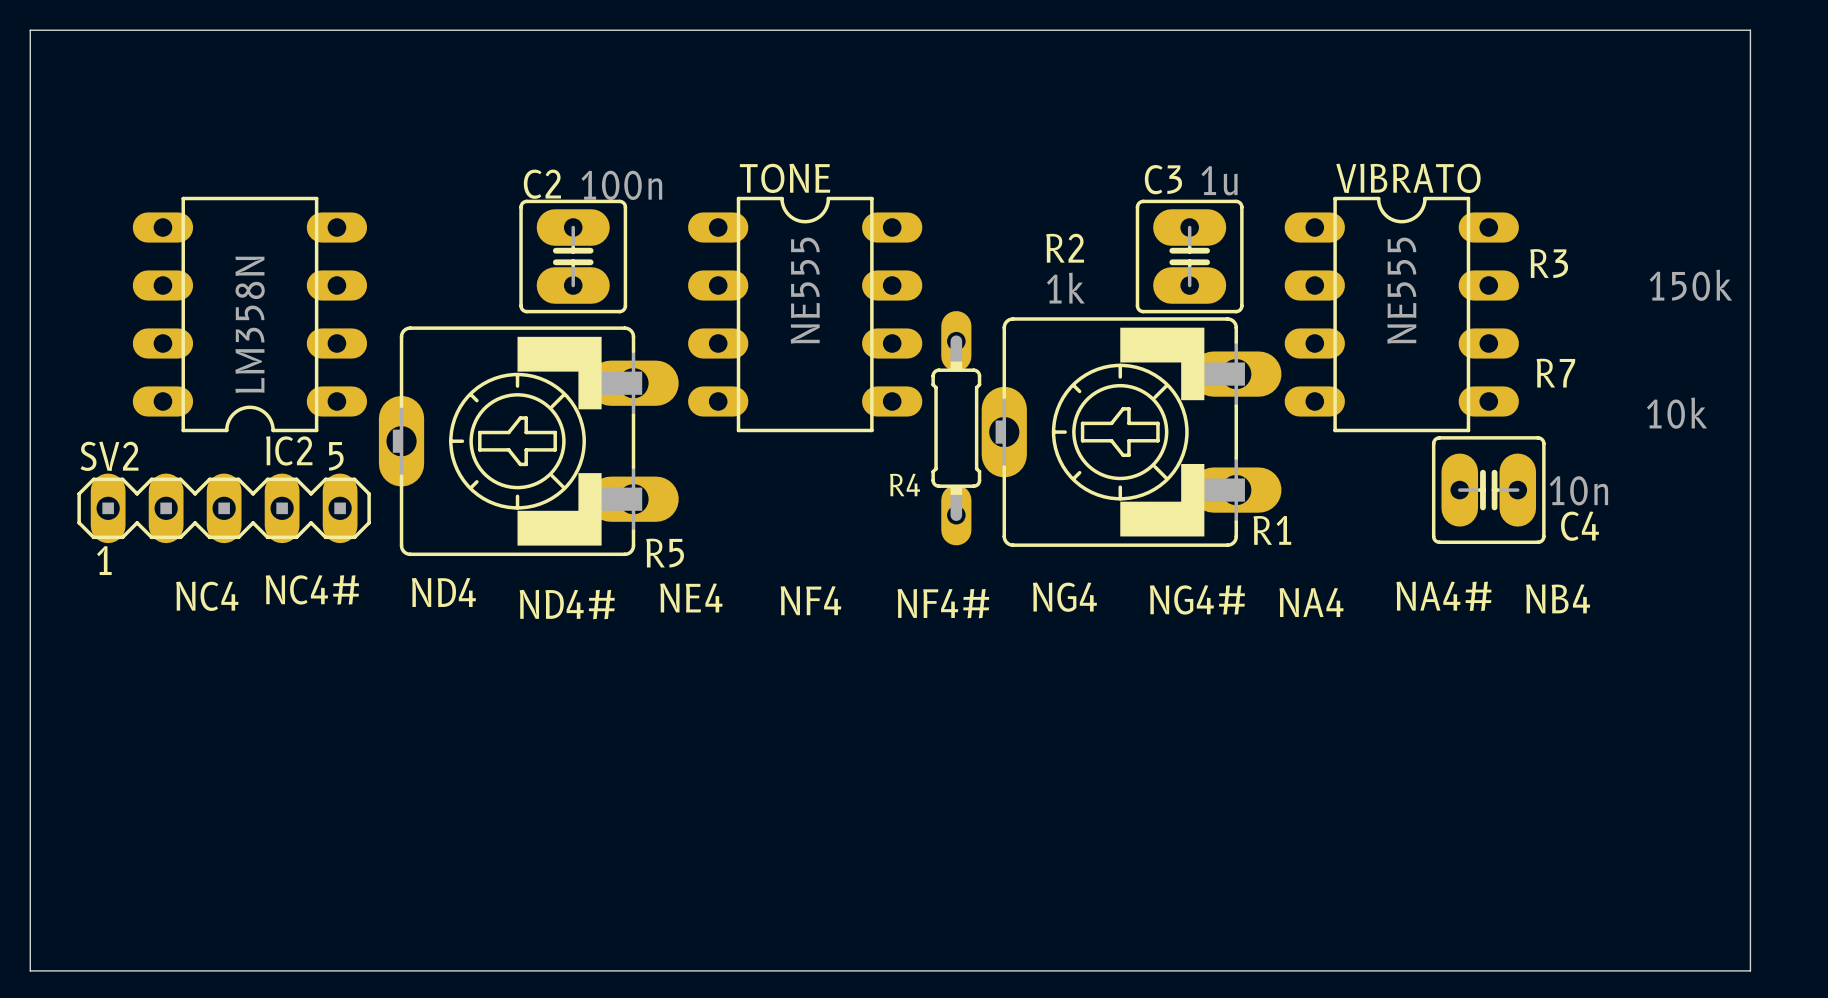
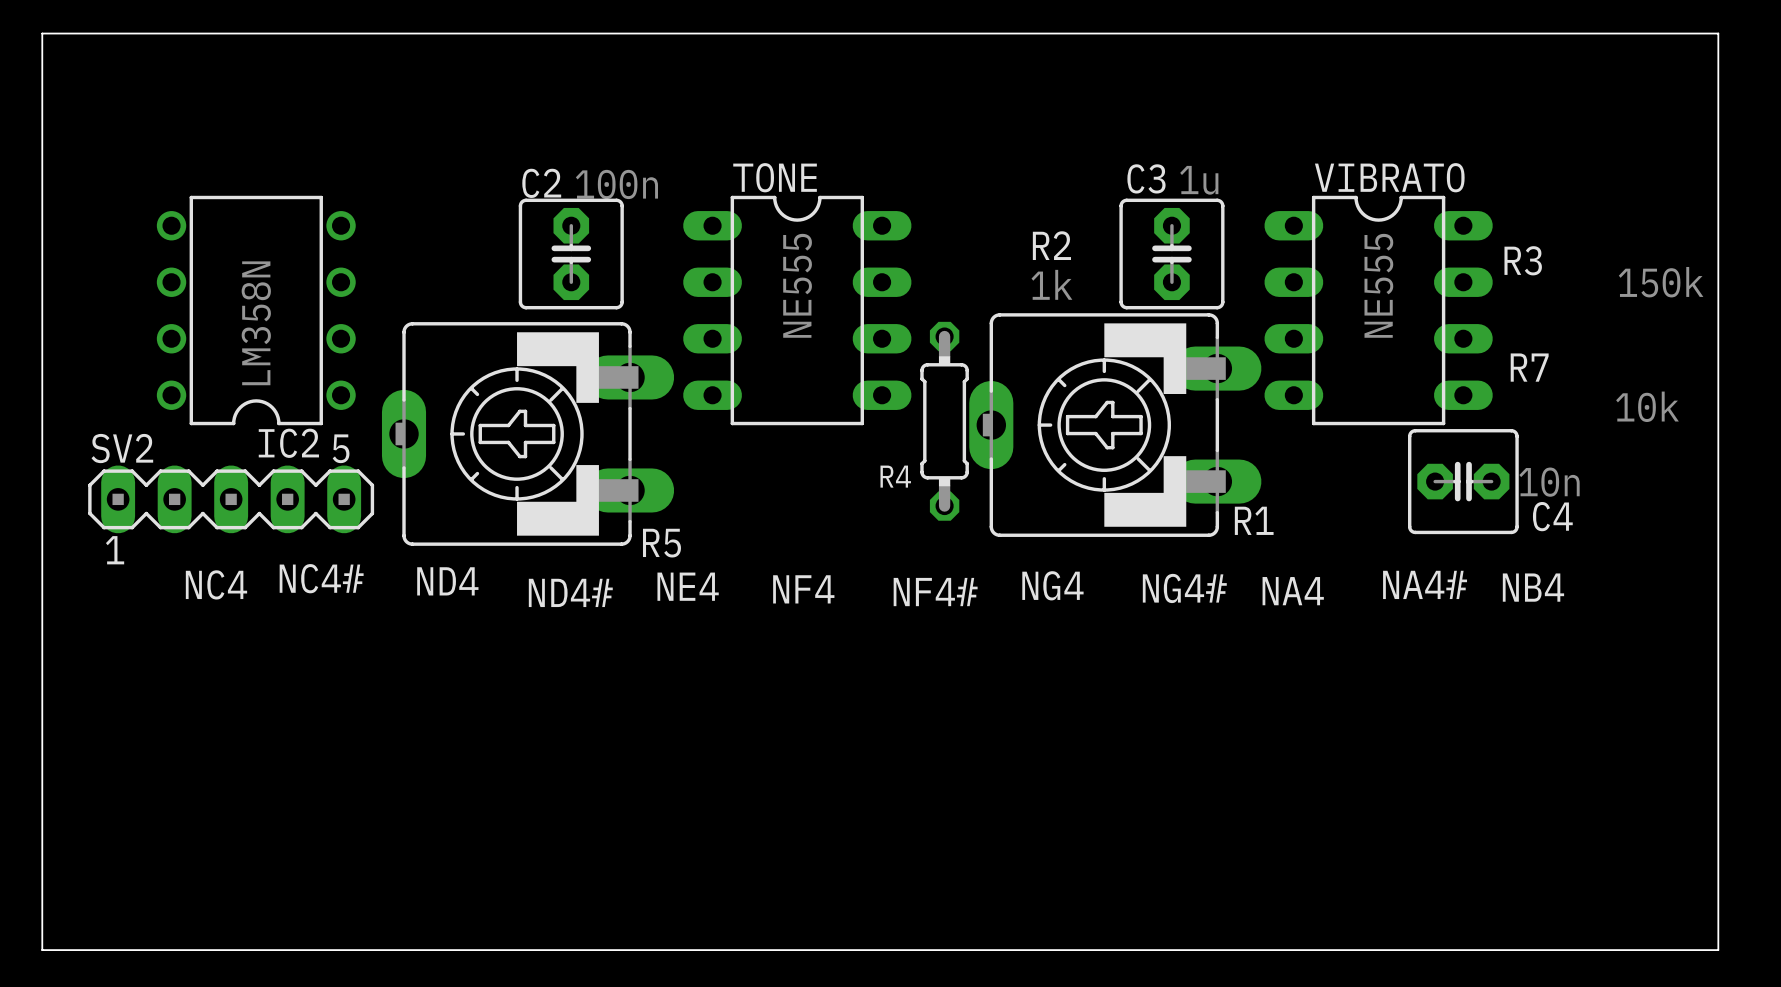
IC2 footprint: [132, 196, 368, 433] -> [156, 195, 356, 426]
C2 footprint: [519, 199, 628, 314] -> [518, 198, 624, 310]
C3 footprint: [1135, 199, 1244, 314] -> [1119, 198, 1225, 310]
R4 footprint: [931, 311, 982, 546] -> [920, 321, 969, 521]
C4 footprint: [1431, 436, 1546, 545] -> [1408, 429, 1519, 535]

